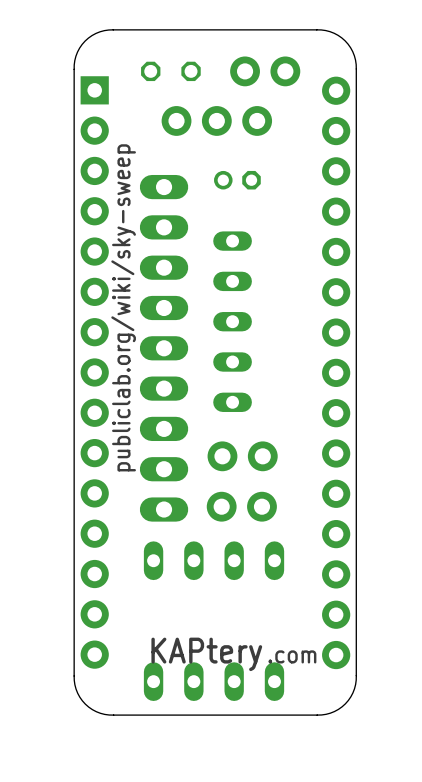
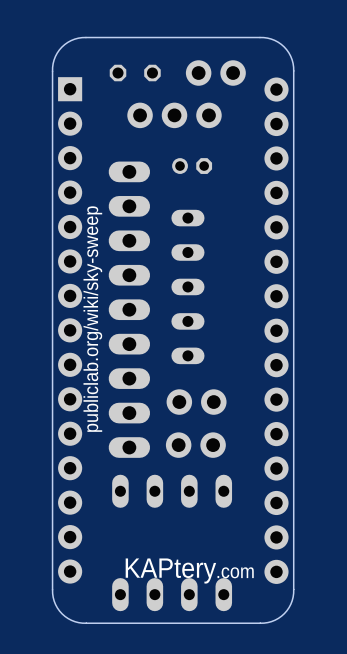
text position: publiclab.org/wiki/sky-sweep (123, 307) -> publiclab.org/wiki/sky-sweep (92, 319)

